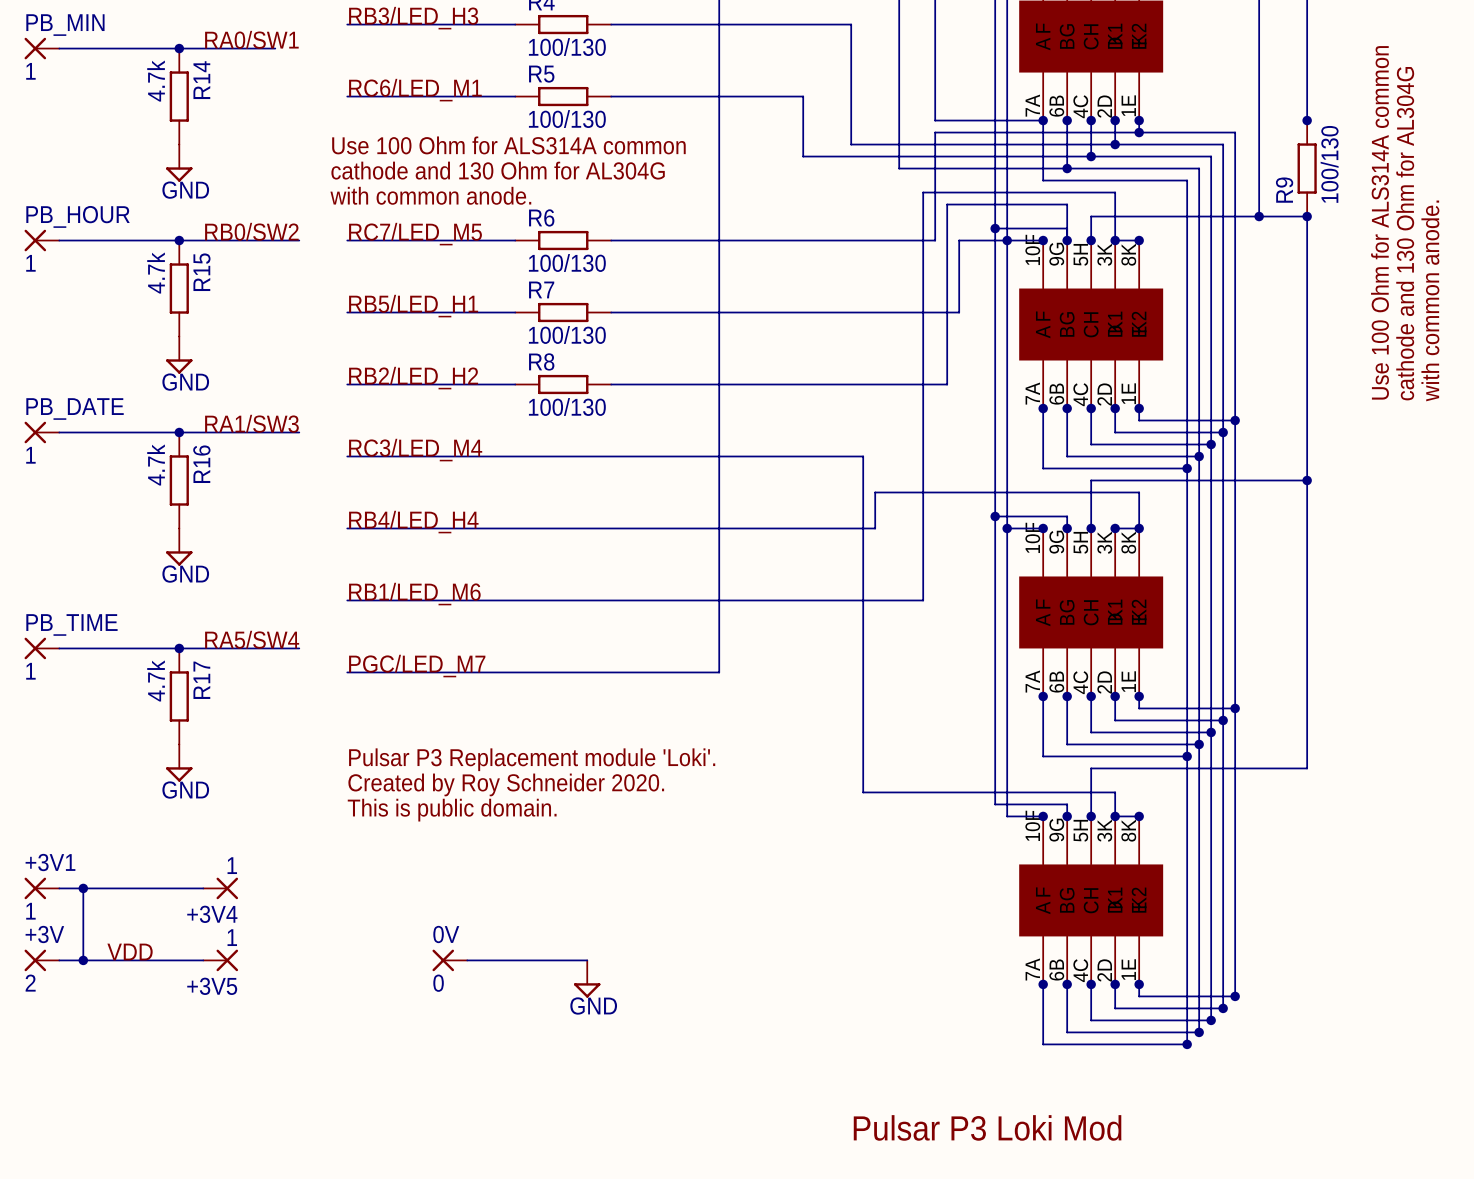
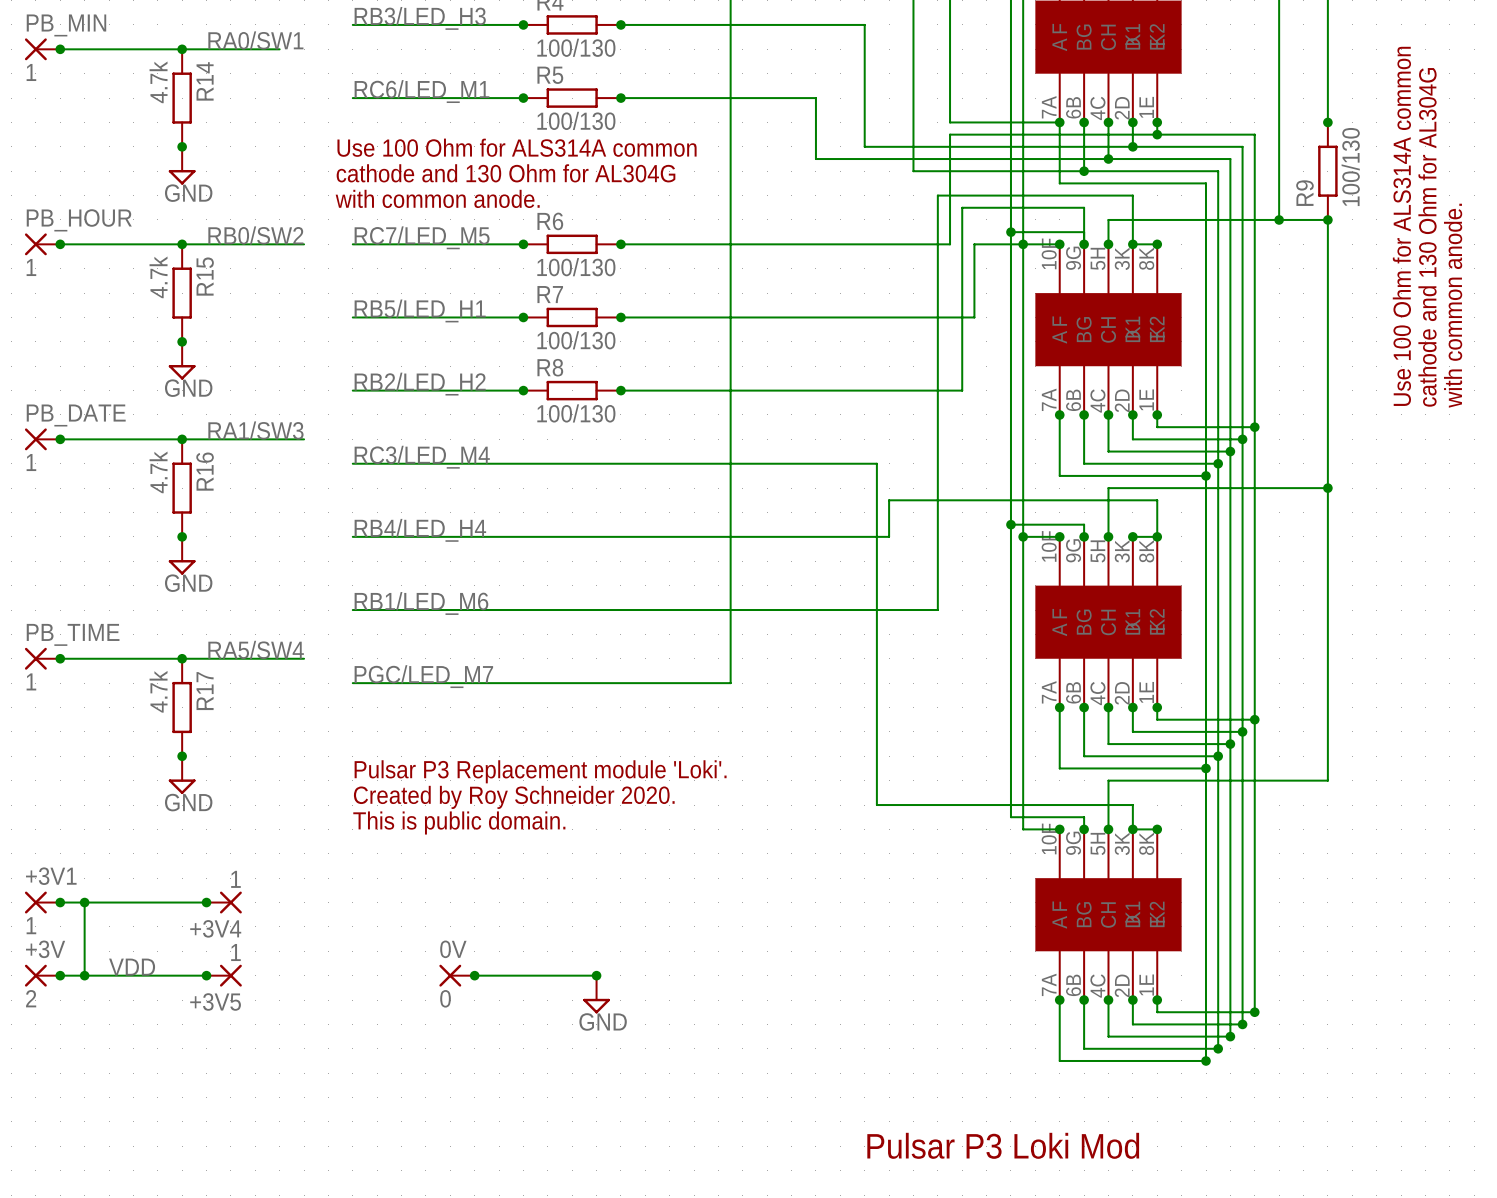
junction: none -> (523, 24)
junction: none -> (620, 24)
junction: none -> (60, 49)
junction: none -> (523, 98)
junction: none -> (620, 98)
junction: none -> (182, 146)
junction: none -> (60, 244)
junction: none -> (523, 244)
junction: none -> (620, 244)
junction: none -> (523, 317)
junction: none -> (620, 317)
junction: none -> (182, 341)
junction: none -> (523, 390)
junction: none -> (620, 390)
junction: none -> (60, 439)
junction: none -> (182, 536)
junction: none -> (60, 658)
junction: none -> (182, 756)
junction: none -> (60, 902)
junction: none -> (206, 902)
junction: none -> (60, 975)
junction: none -> (206, 975)
junction: none -> (474, 975)
junction: none -> (596, 975)

